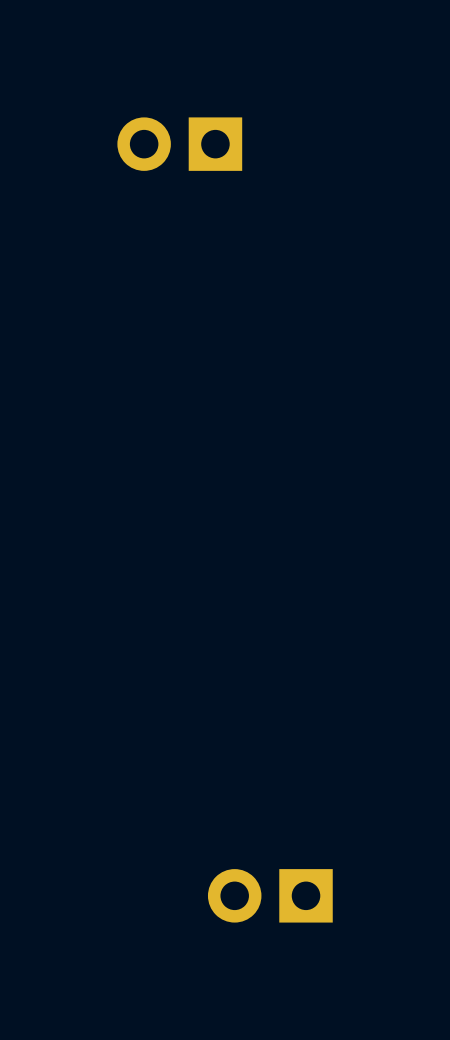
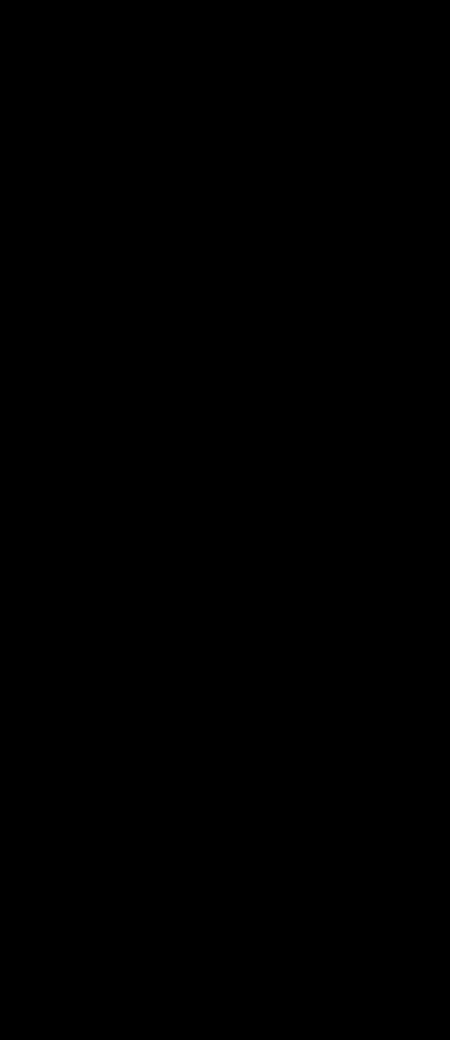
part: (179, 144) -> none
part: (270, 895) -> none

